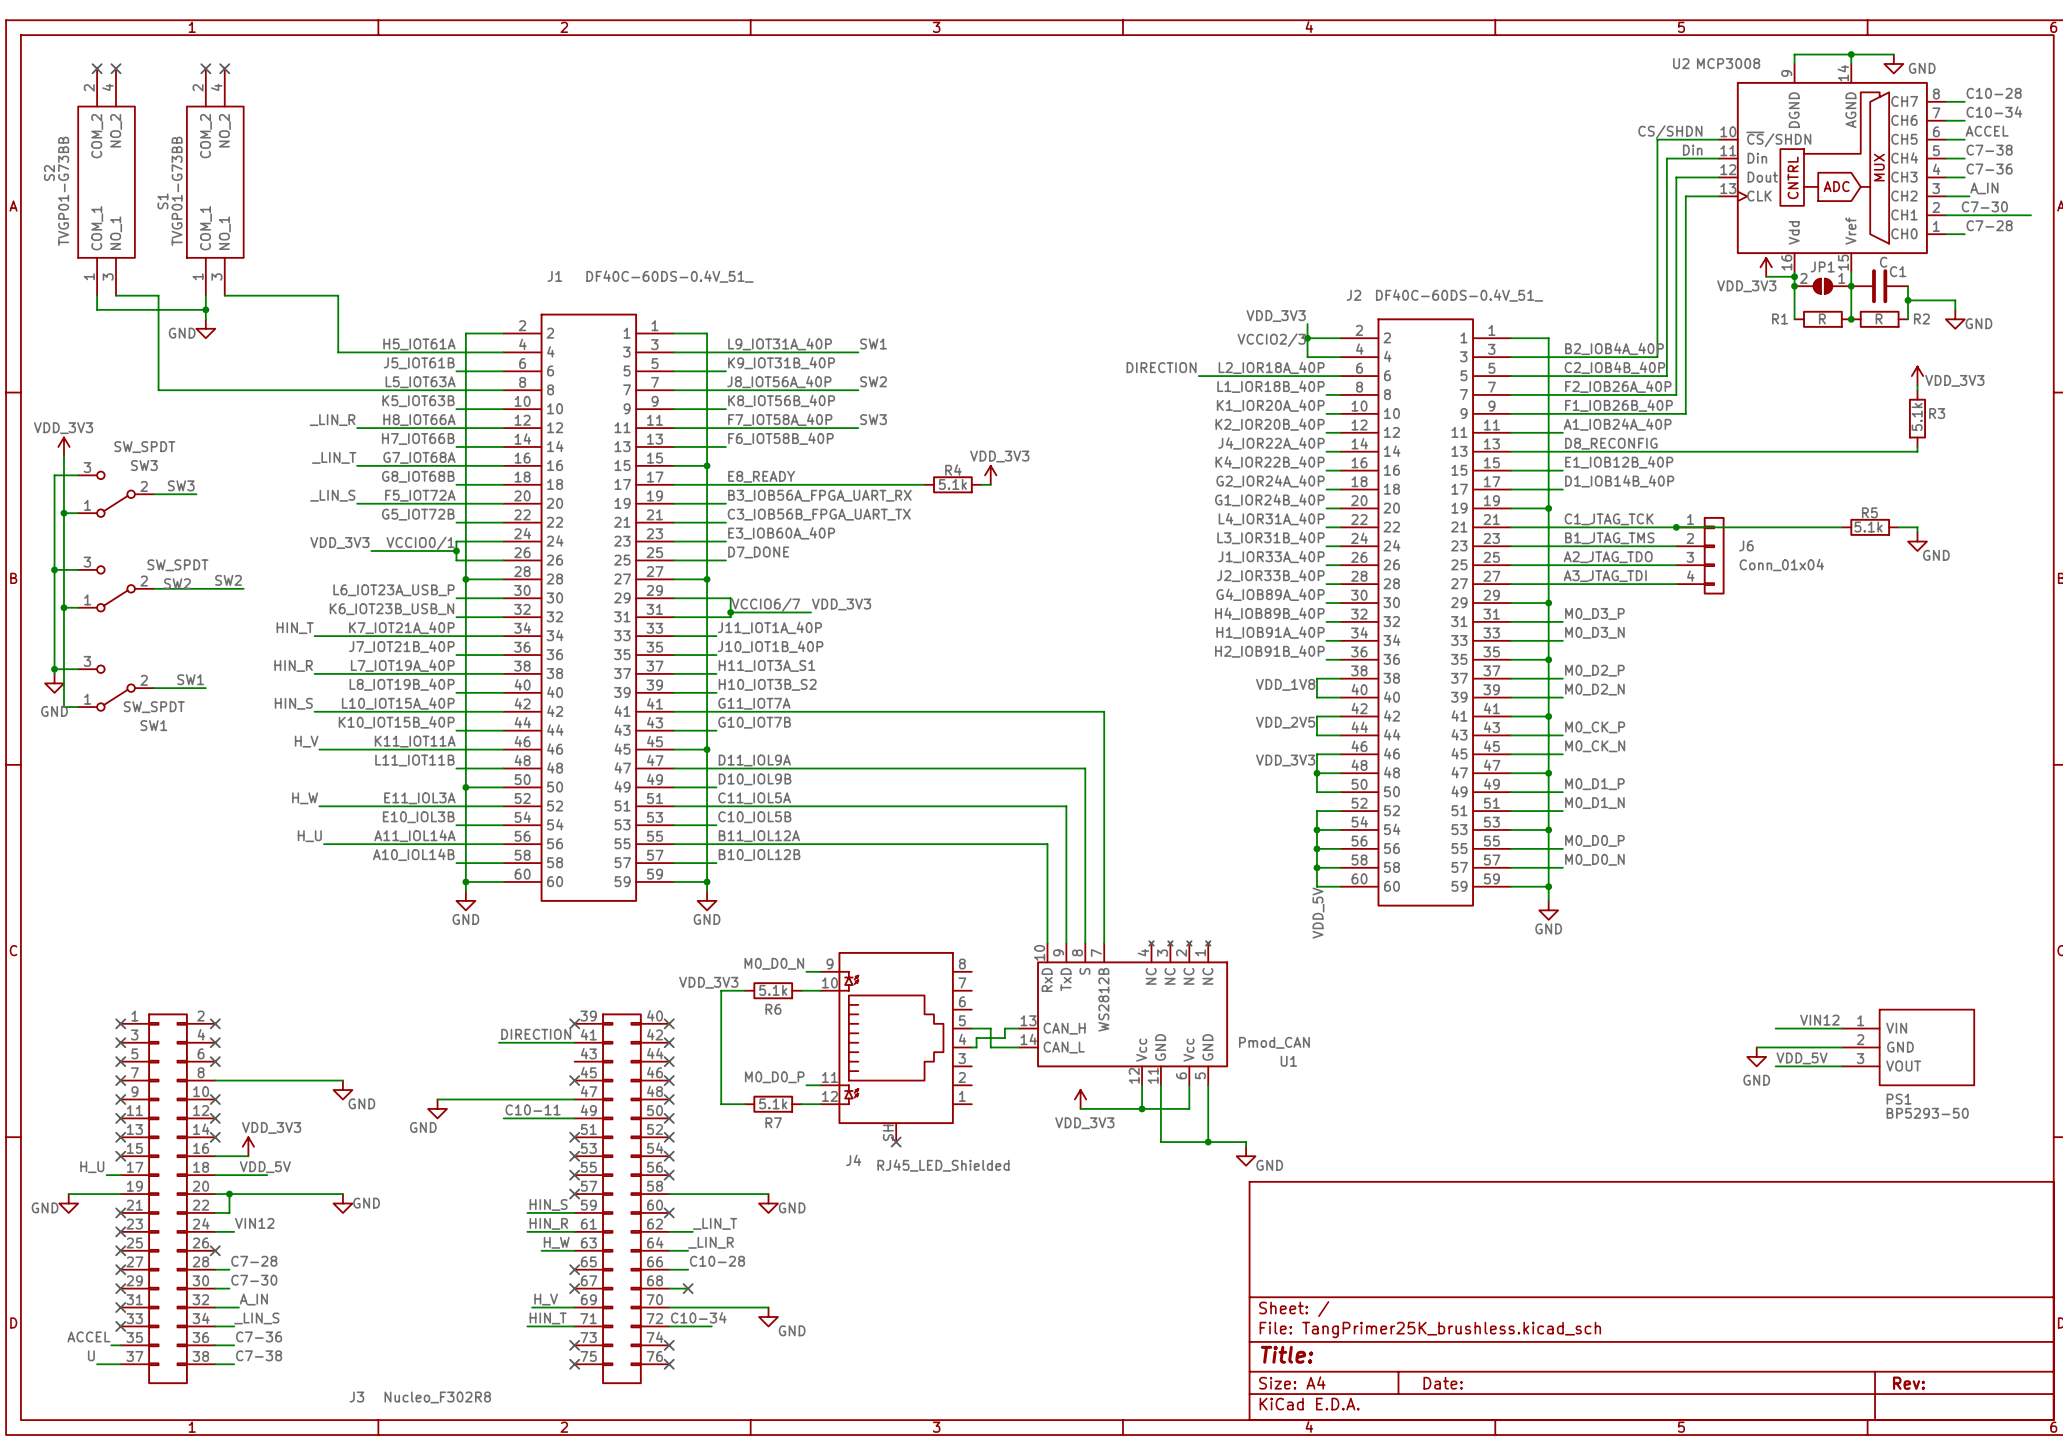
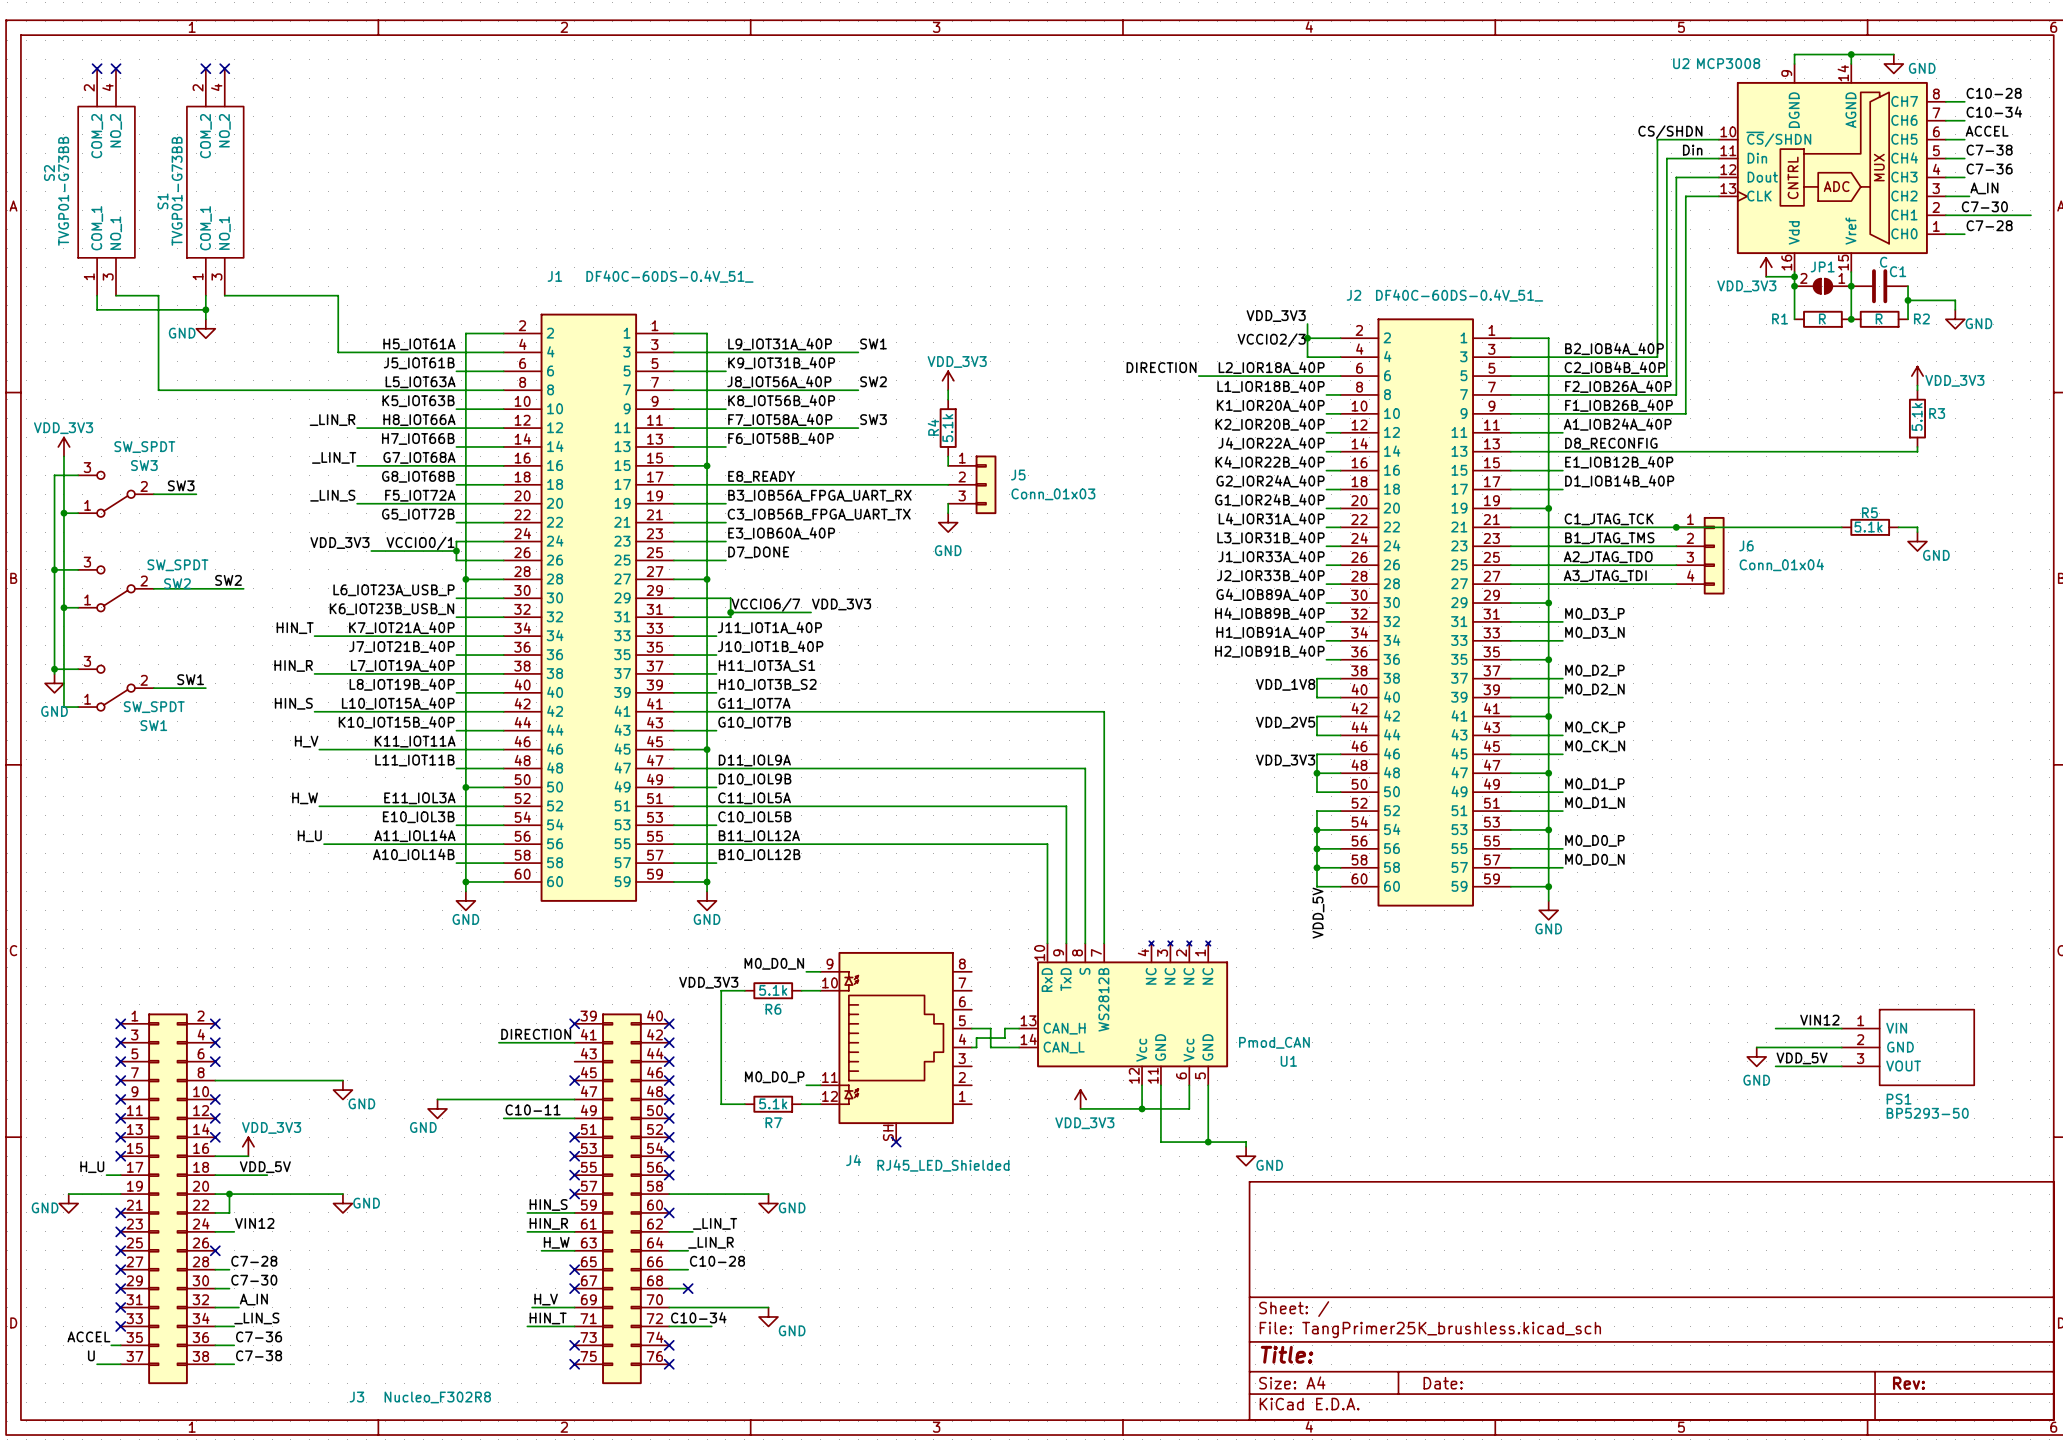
wire: none -> (948, 390) (948, 399)
wire: none -> (948, 456) (948, 465)
R4 name position: R4 (953, 470) -> R4 (933, 427)
power symbol position: VDD_3V3 (990, 475) -> VDD_3V3 (948, 380)
R4 rotation: 0° (952, 484) -> 90° clockwise (948, 428)
R4 position: (952, 484) -> (948, 428)
J5: none -> Conn_01x03 (972, 484)
wire: none -> (948, 503) (948, 513)
power symbol: none -> GND (948, 522)

